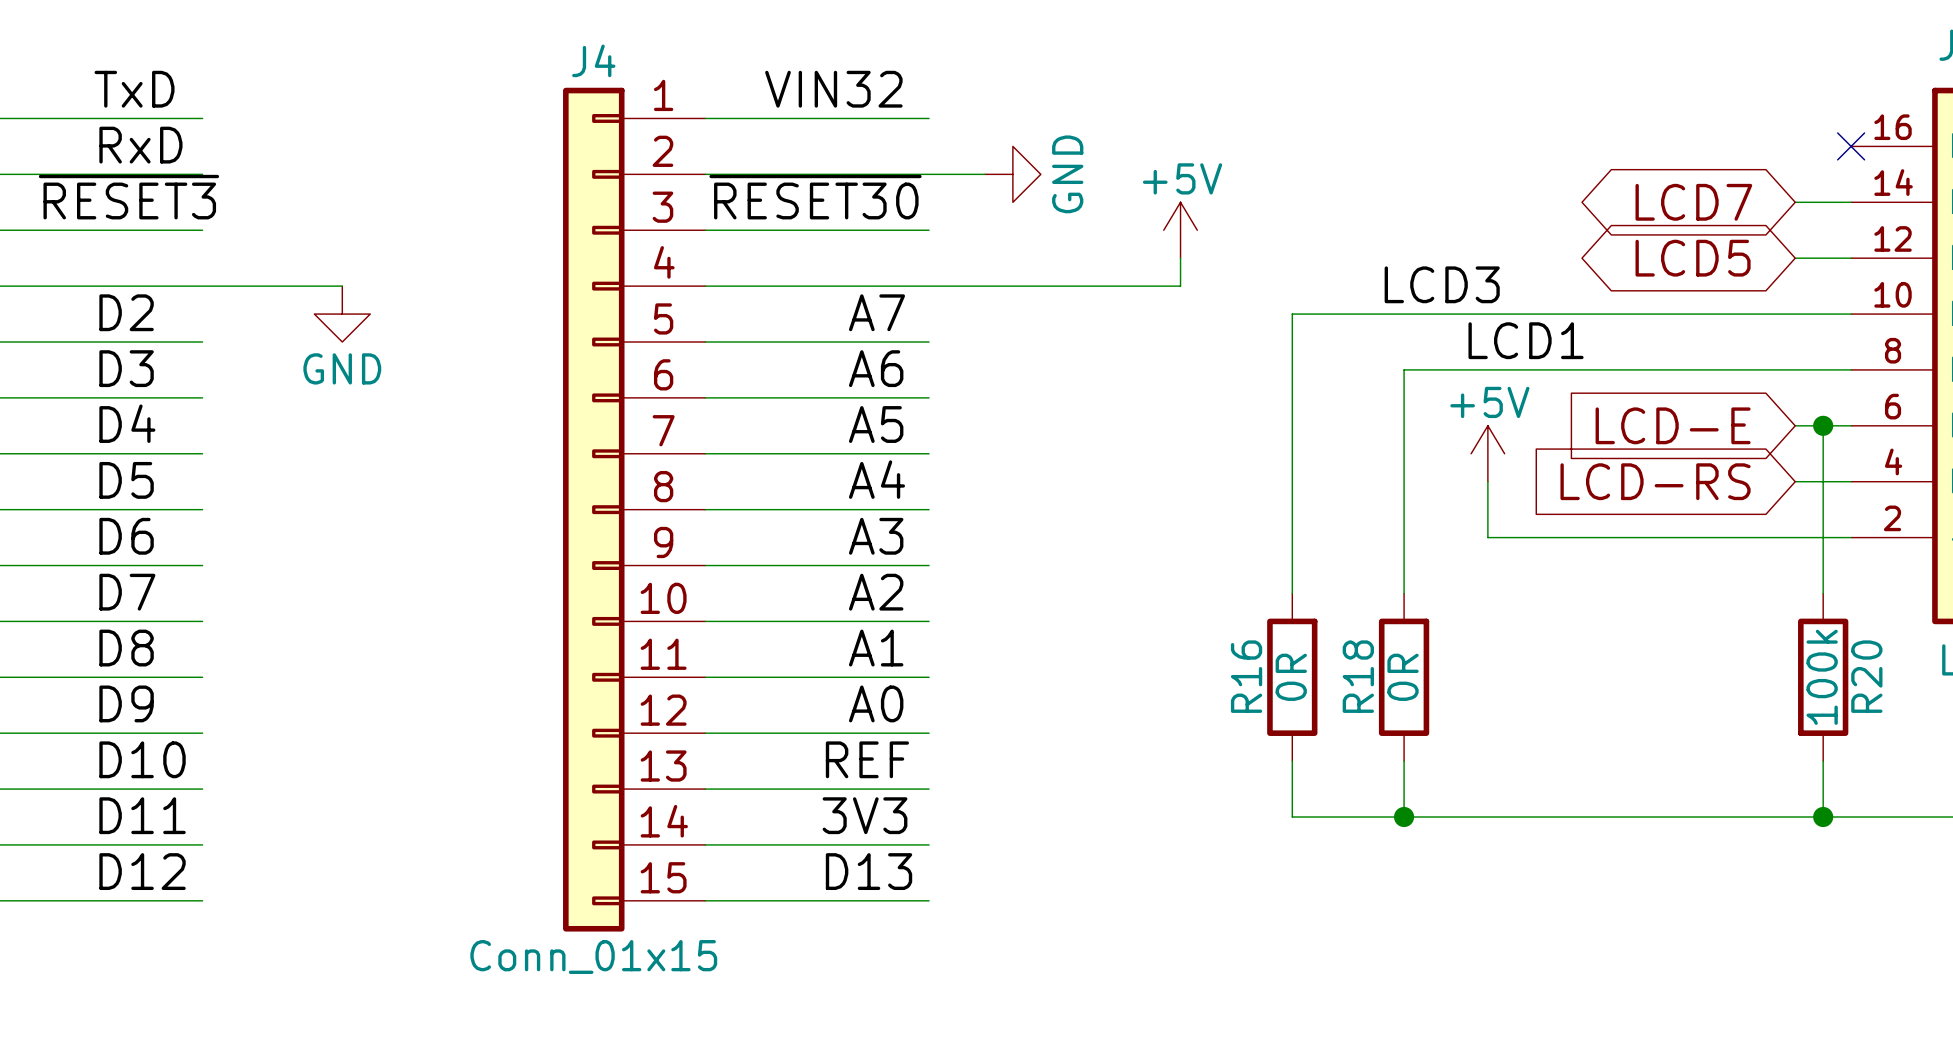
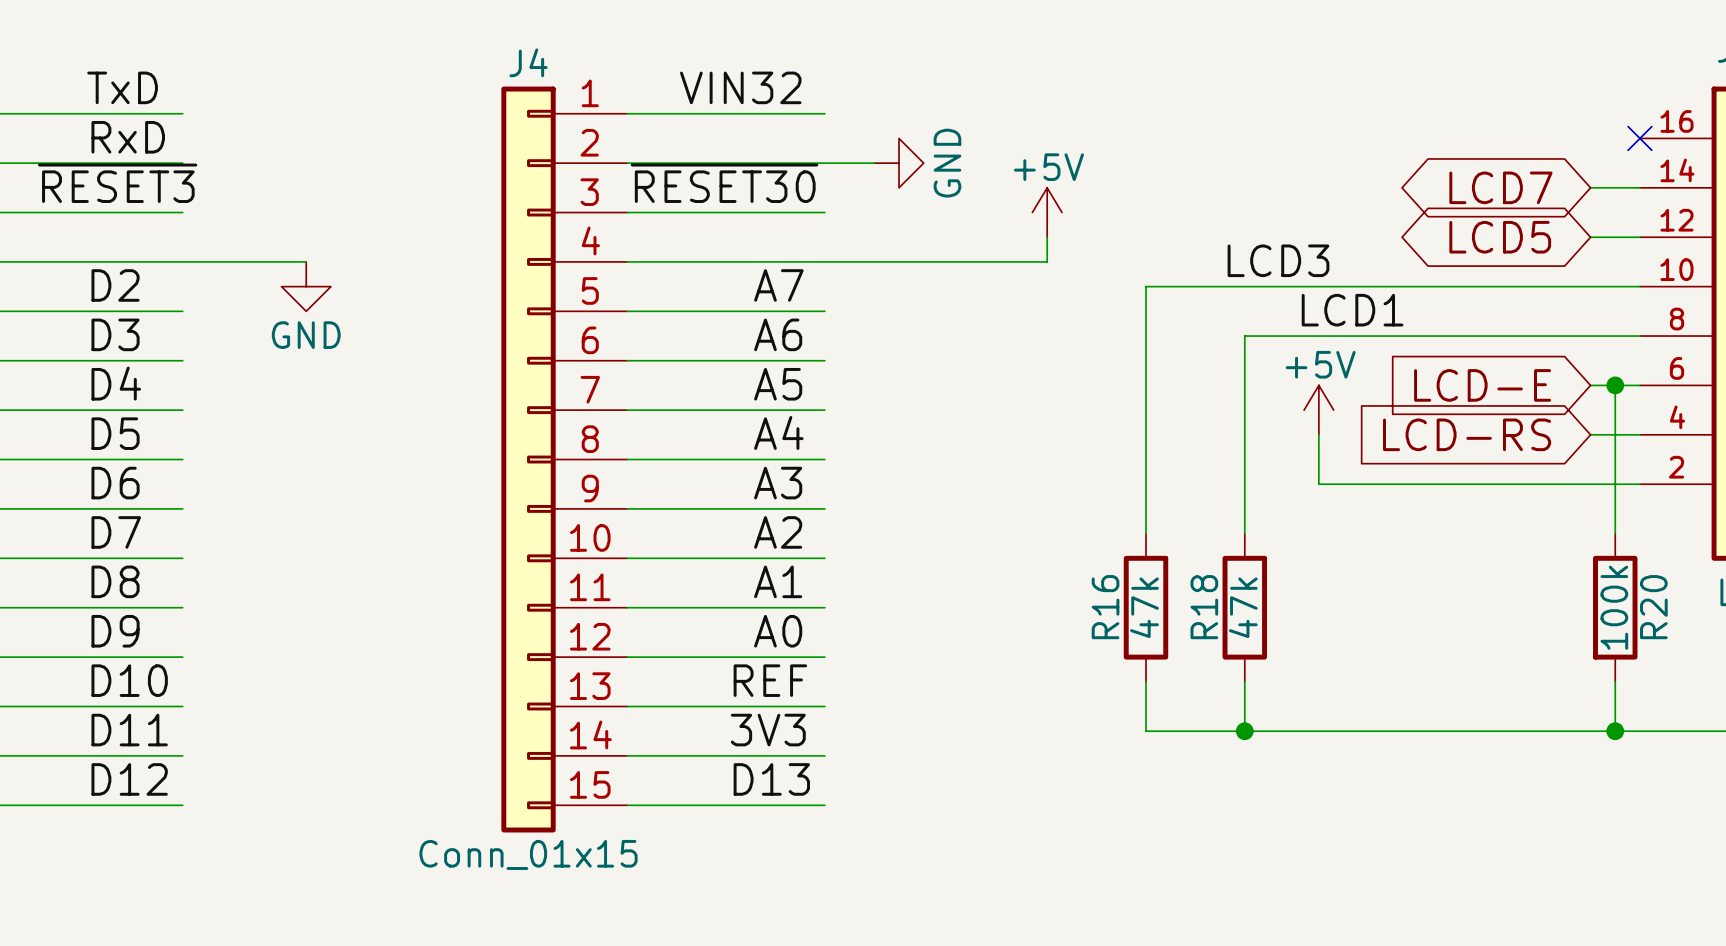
R16 value: 0R (1291, 677) -> 47k (1144, 607)
R18 value: 0R (1403, 677) -> 47k (1243, 607)

